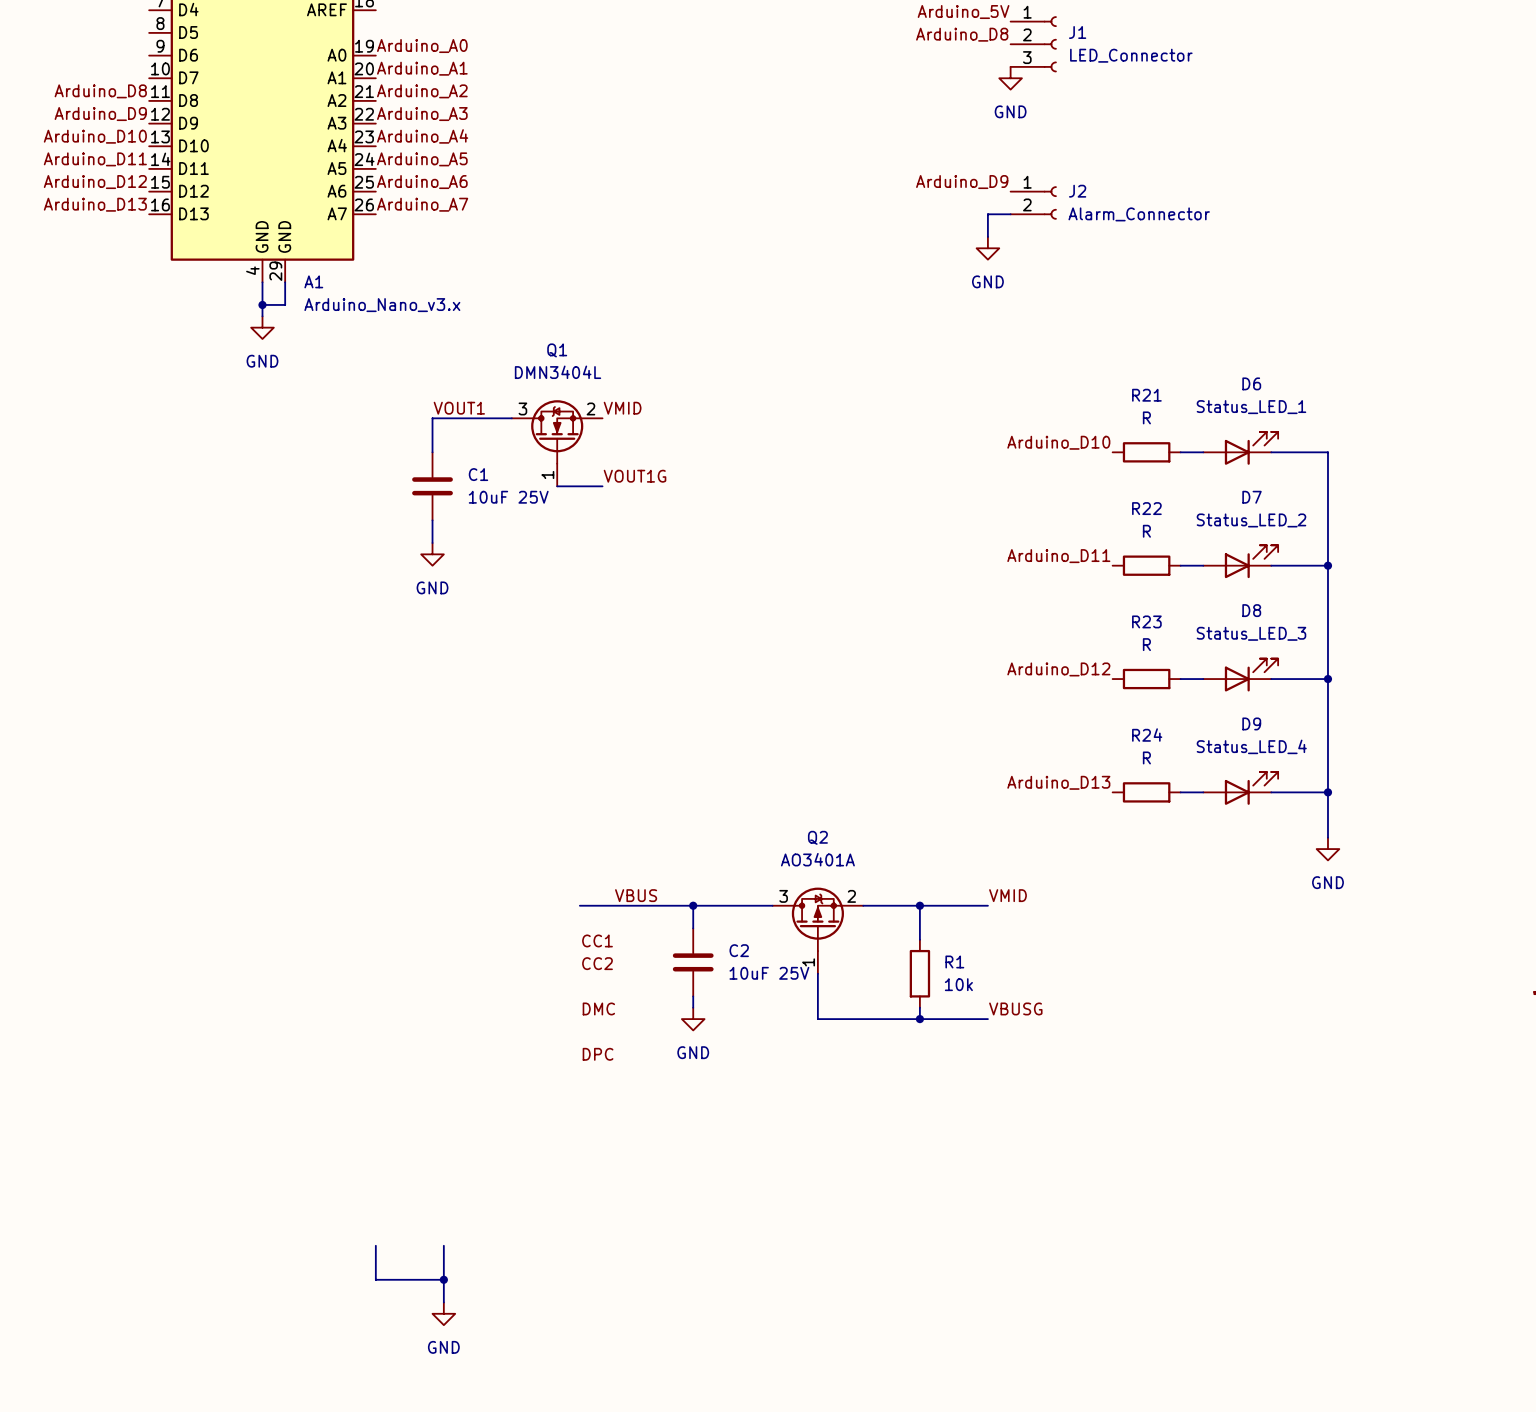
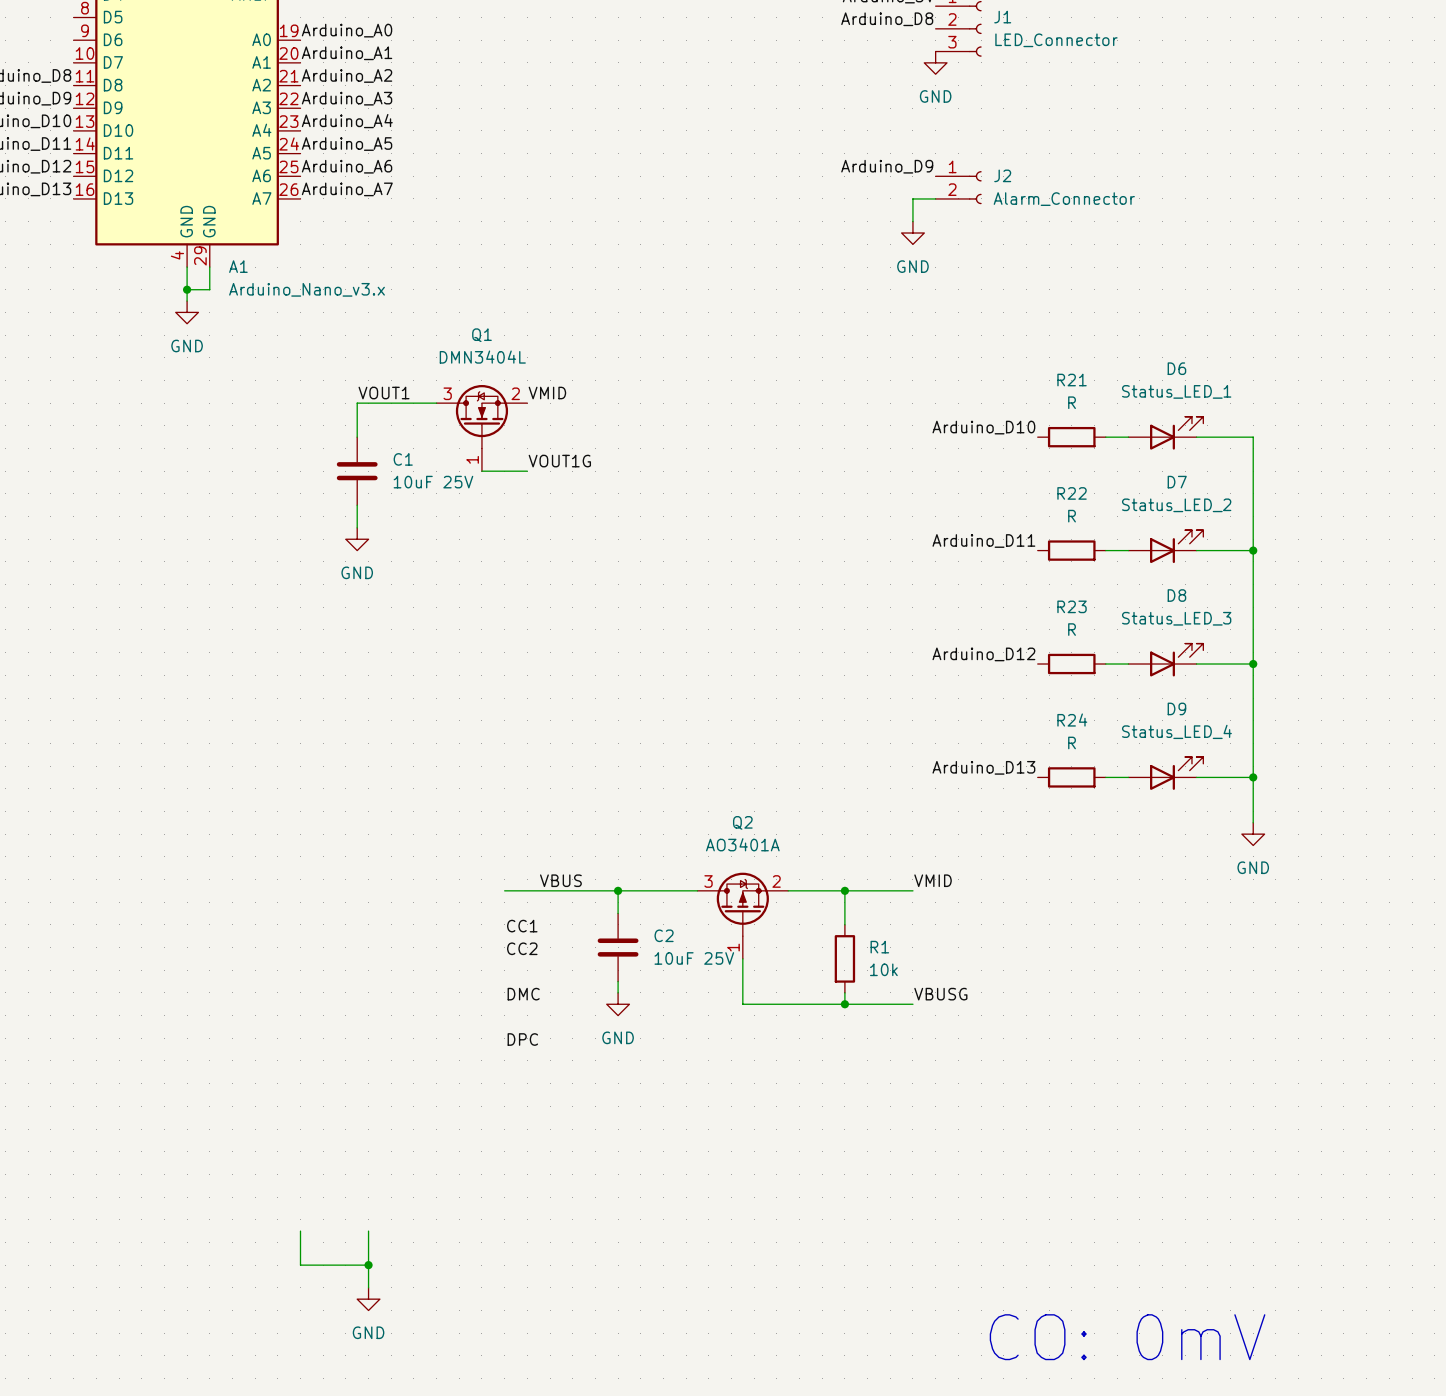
text: none -> CO: 0mV (1127, 1337)

